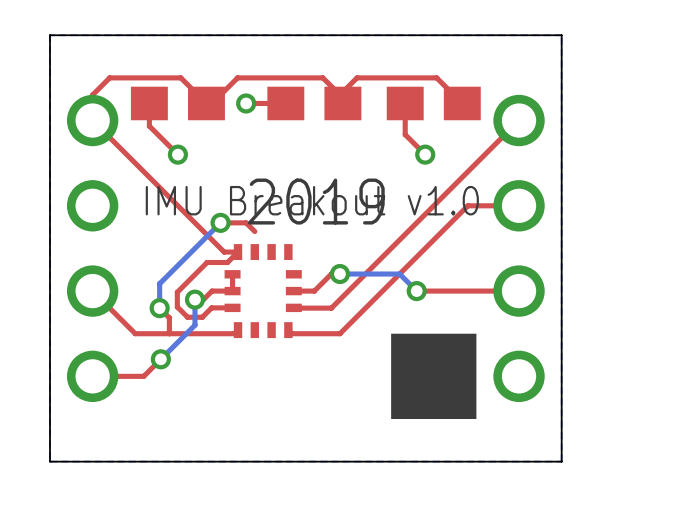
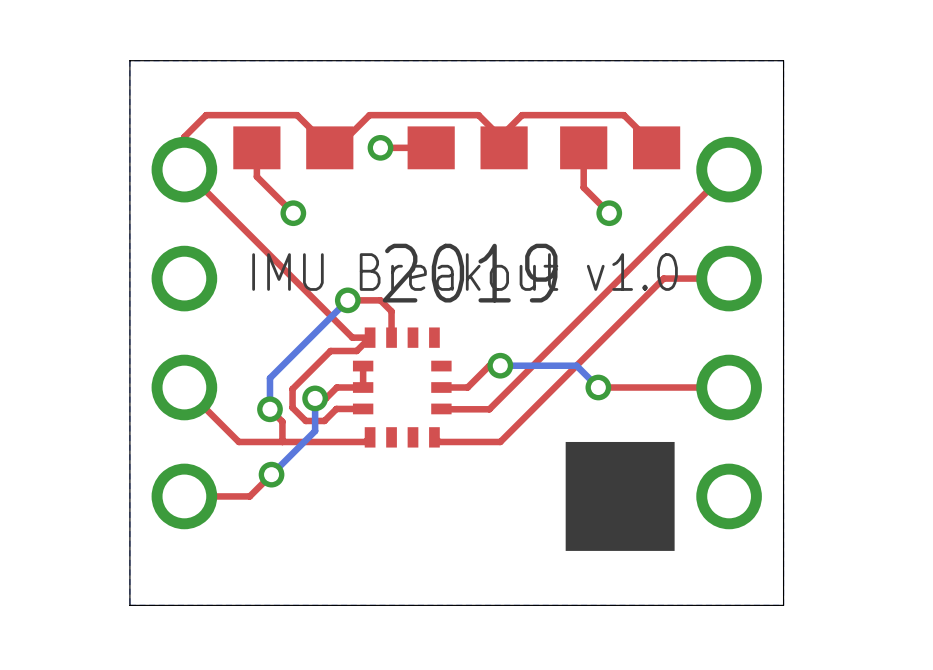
top track: none -> (391, 311) (391, 337)

